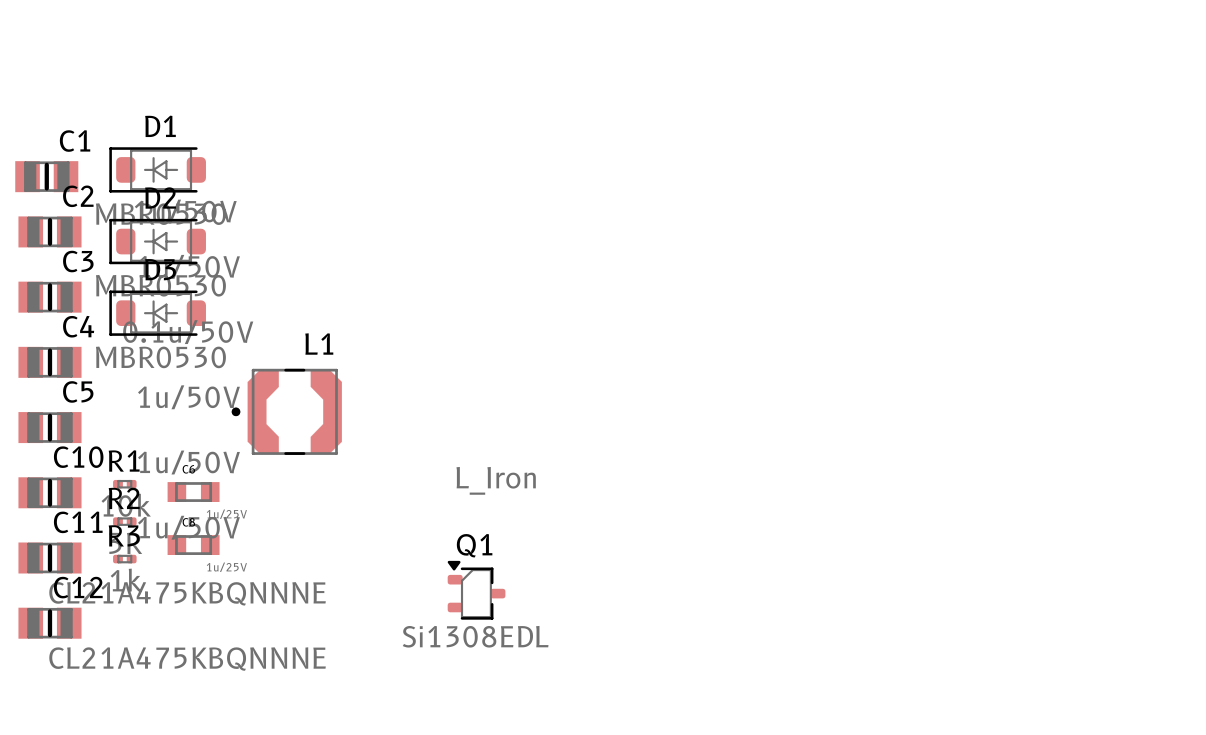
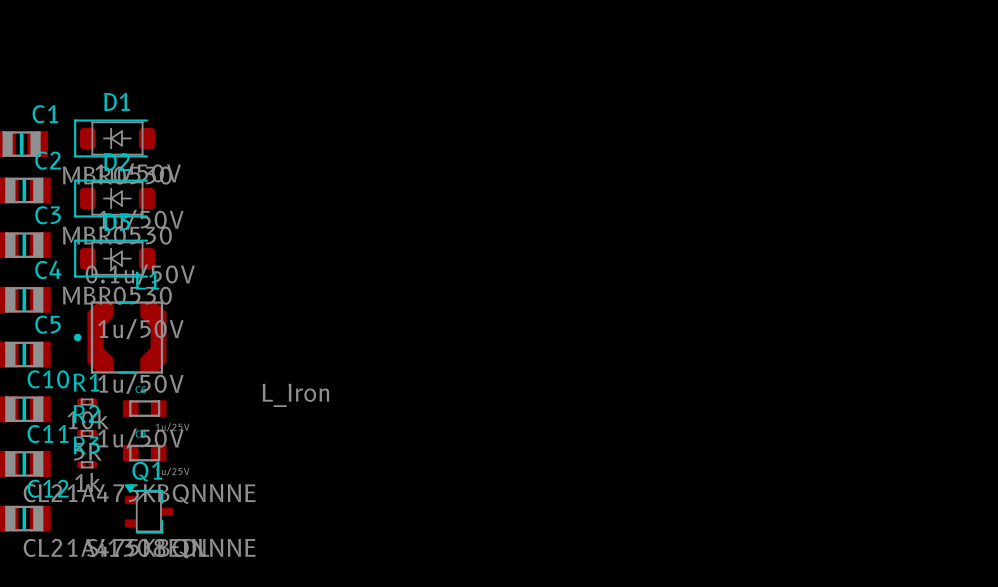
L1 position: (286, 411) -> (120, 337)
Q1 position: (476, 590) -> (148, 508)

